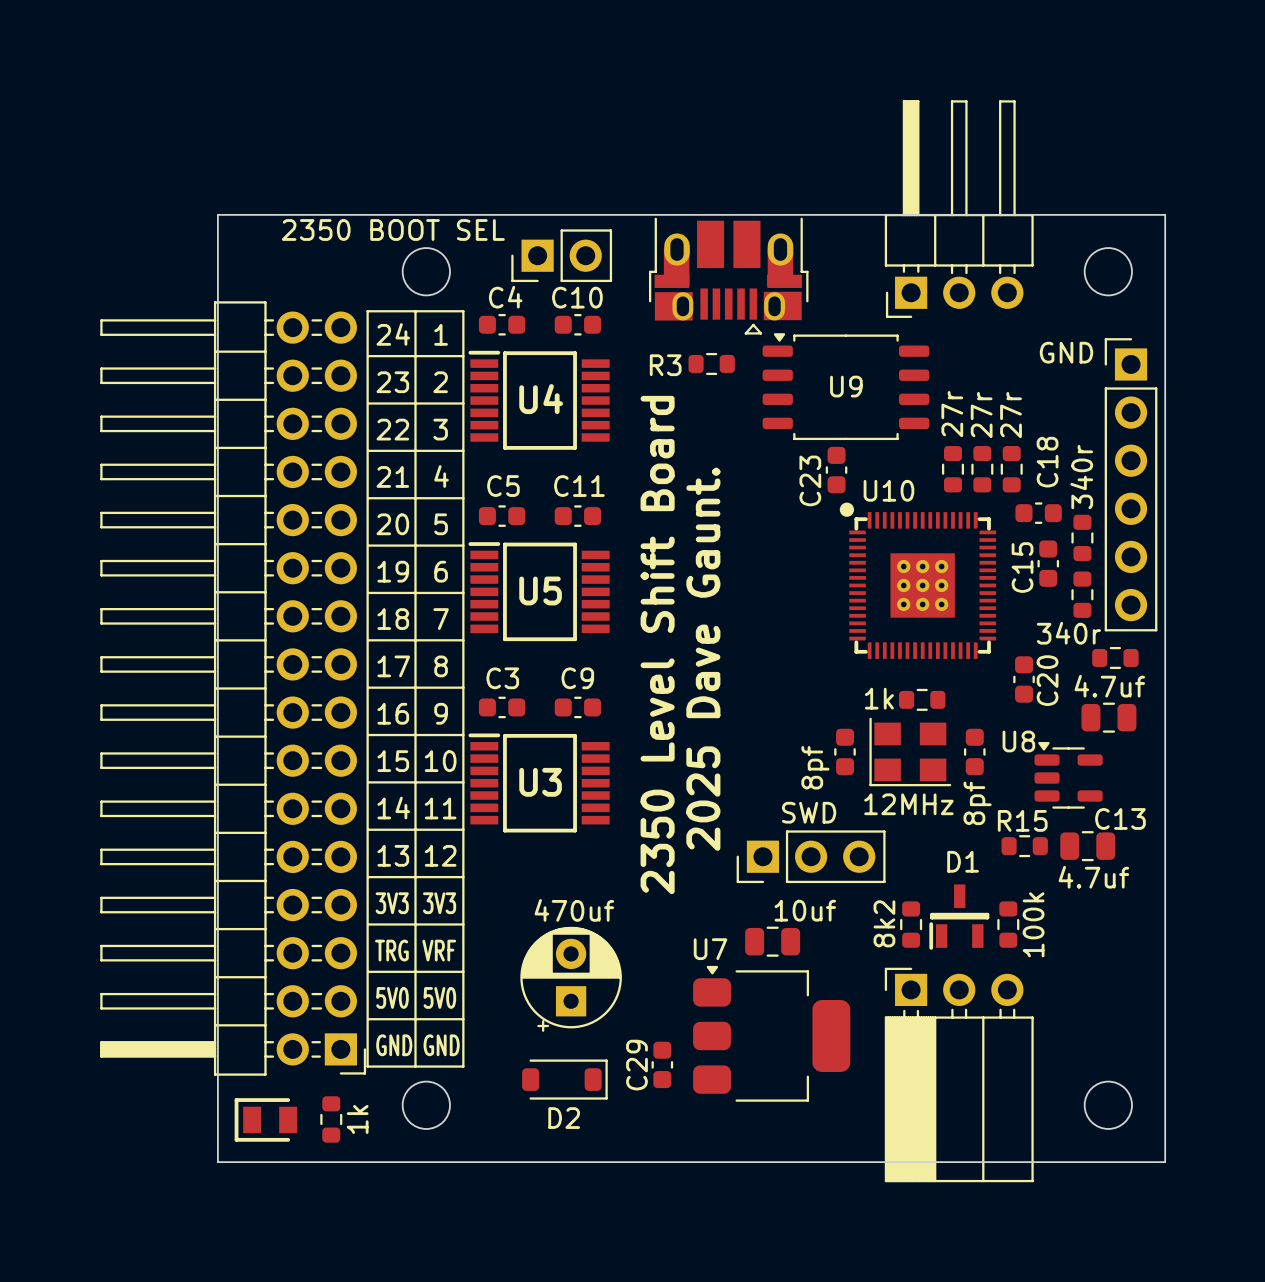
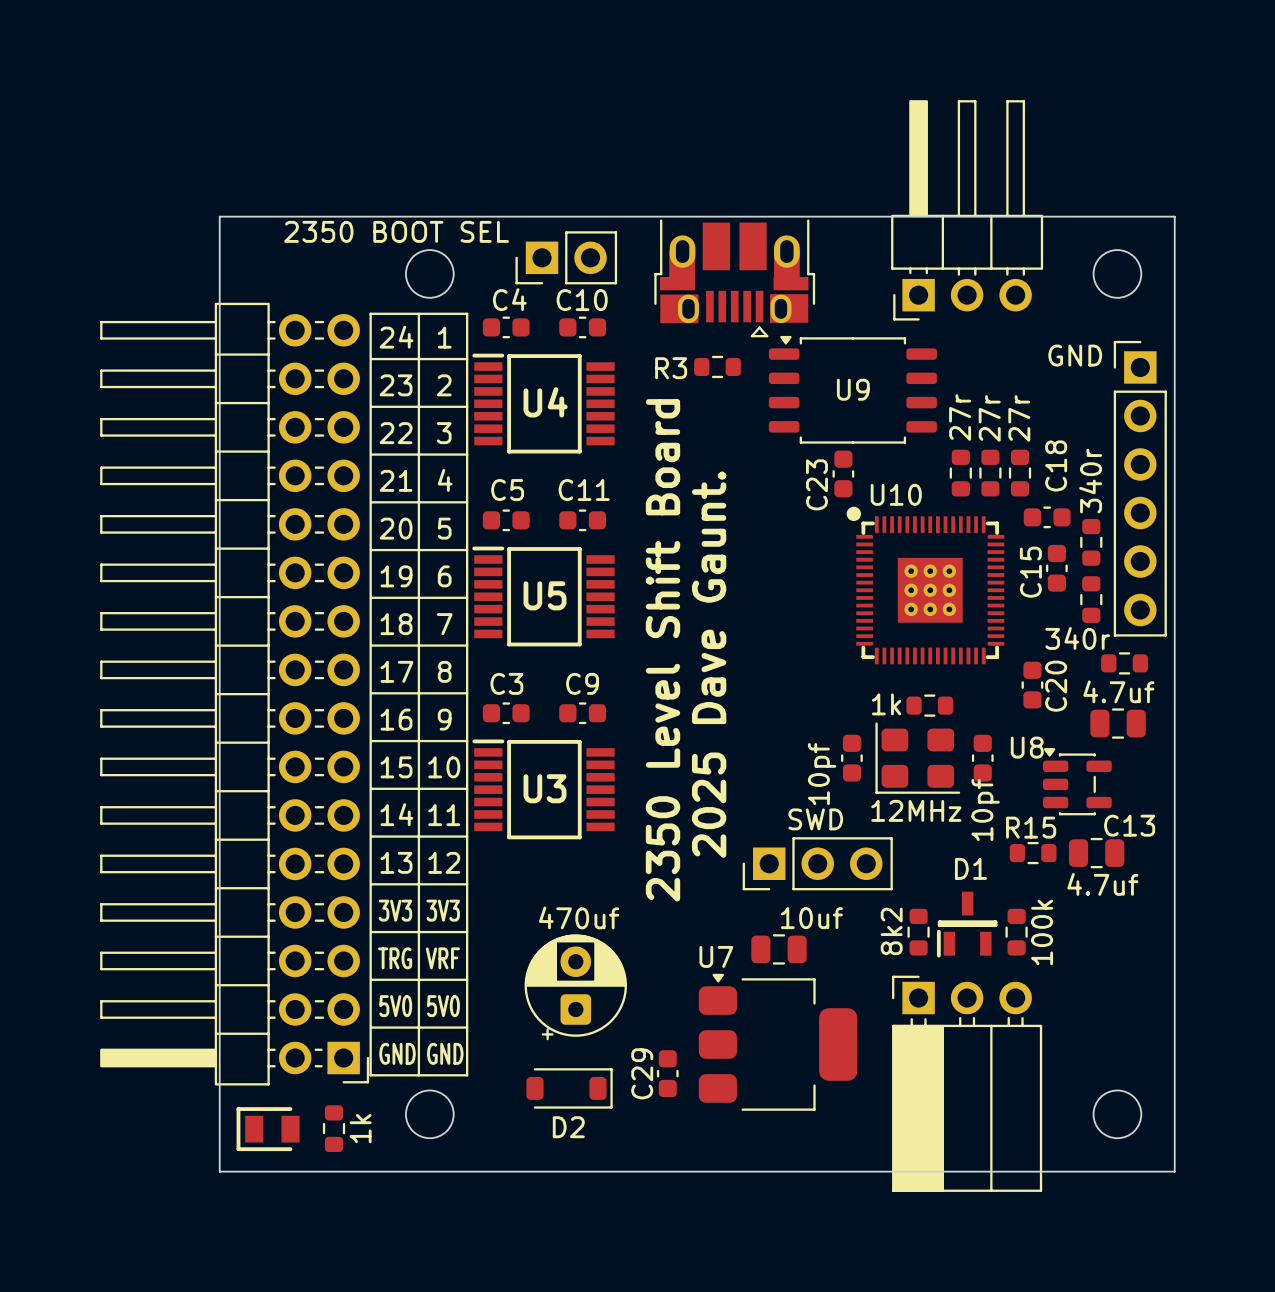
part footprint: [884, 100, 1034, 318] -> [891, 100, 1044, 321]
part footprint: [100, 301, 367, 1076] -> [100, 302, 370, 1086]
part footprint: [869, 717, 952, 787] -> [875, 722, 961, 794]
U8 footprint: [1034, 742, 1103, 809] -> [1042, 748, 1112, 816]
part value: 8pf (815, 767) -> 10pf (822, 774)
part value: 8pf (977, 803) -> 10pf (985, 809)
part footprint: [520, 926, 622, 1032] -> [524, 934, 627, 1041]

